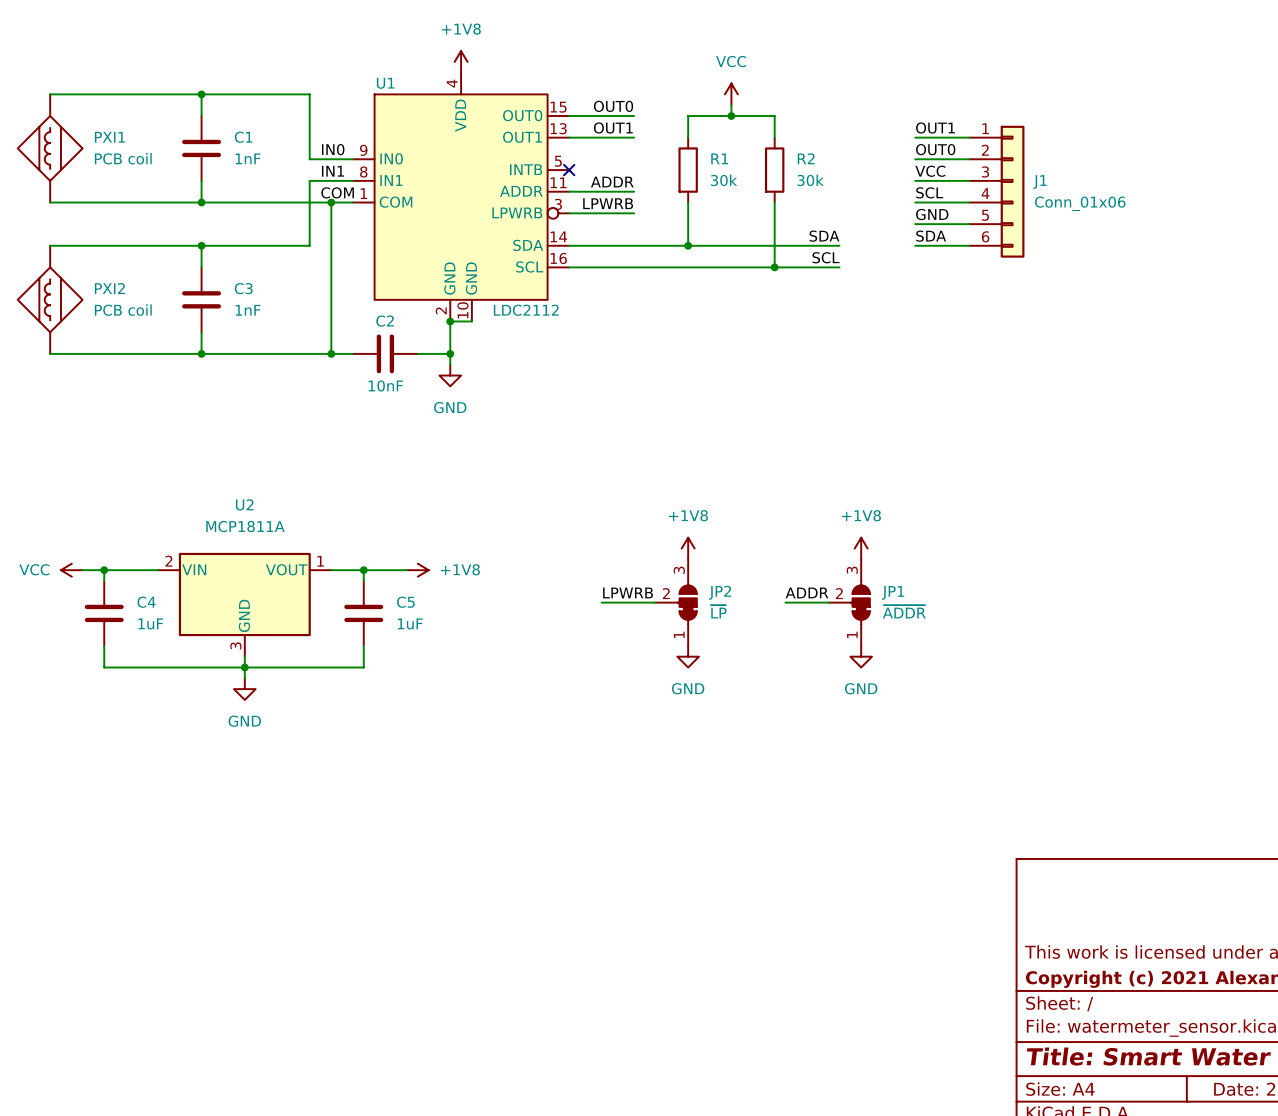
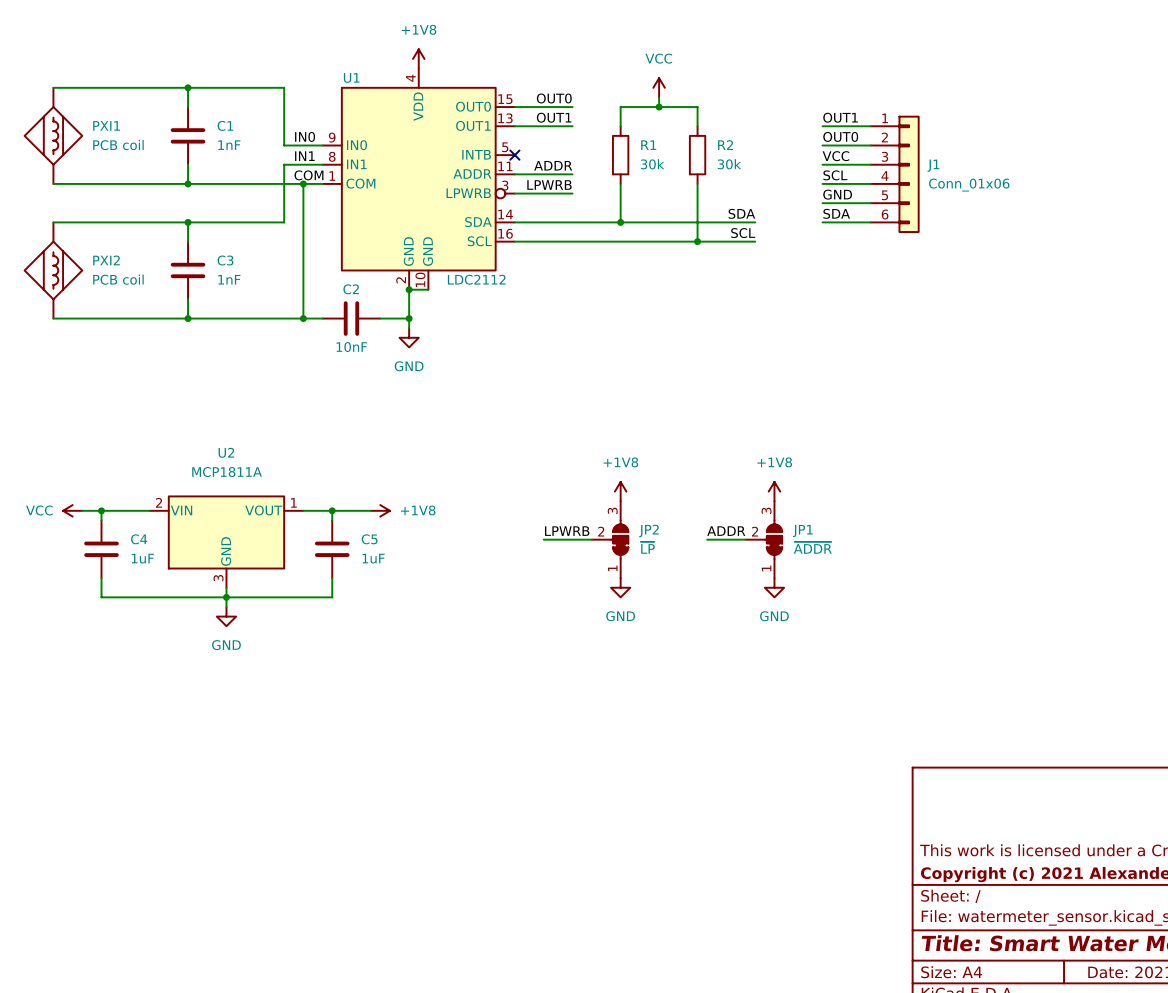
PXI1 symbol: [17, 94, 84, 203] -> [24, 87, 83, 184]
PXI2 symbol: [17, 245, 84, 354] -> [24, 222, 83, 319]

